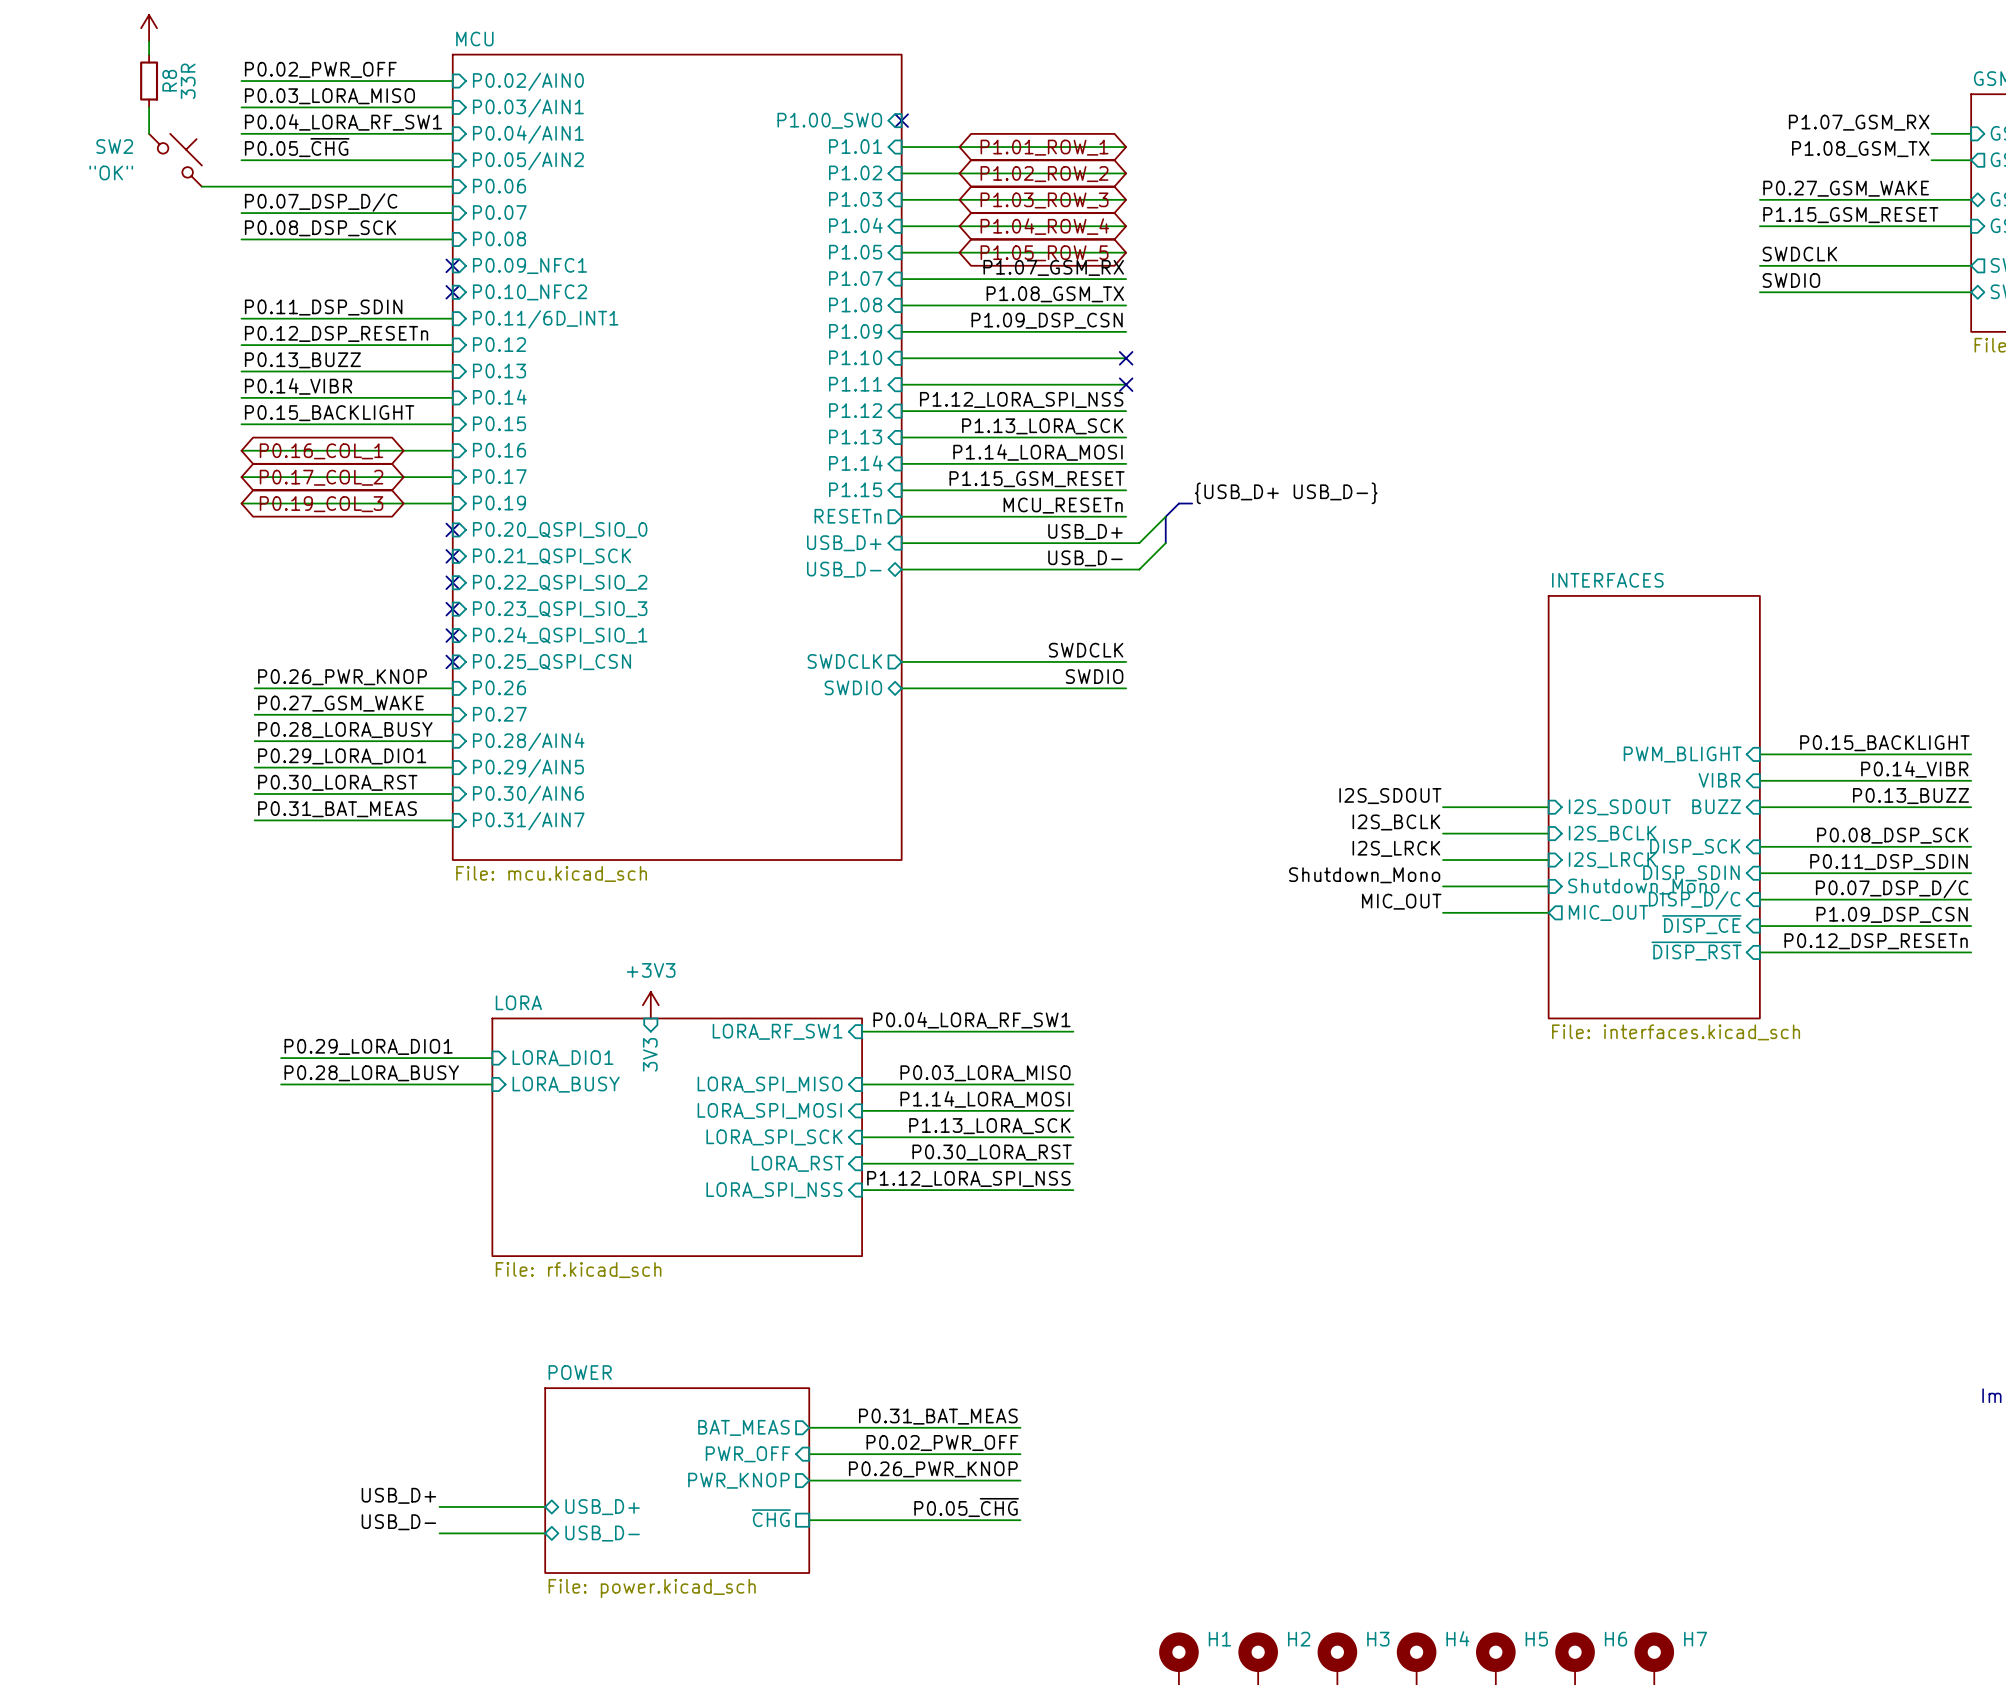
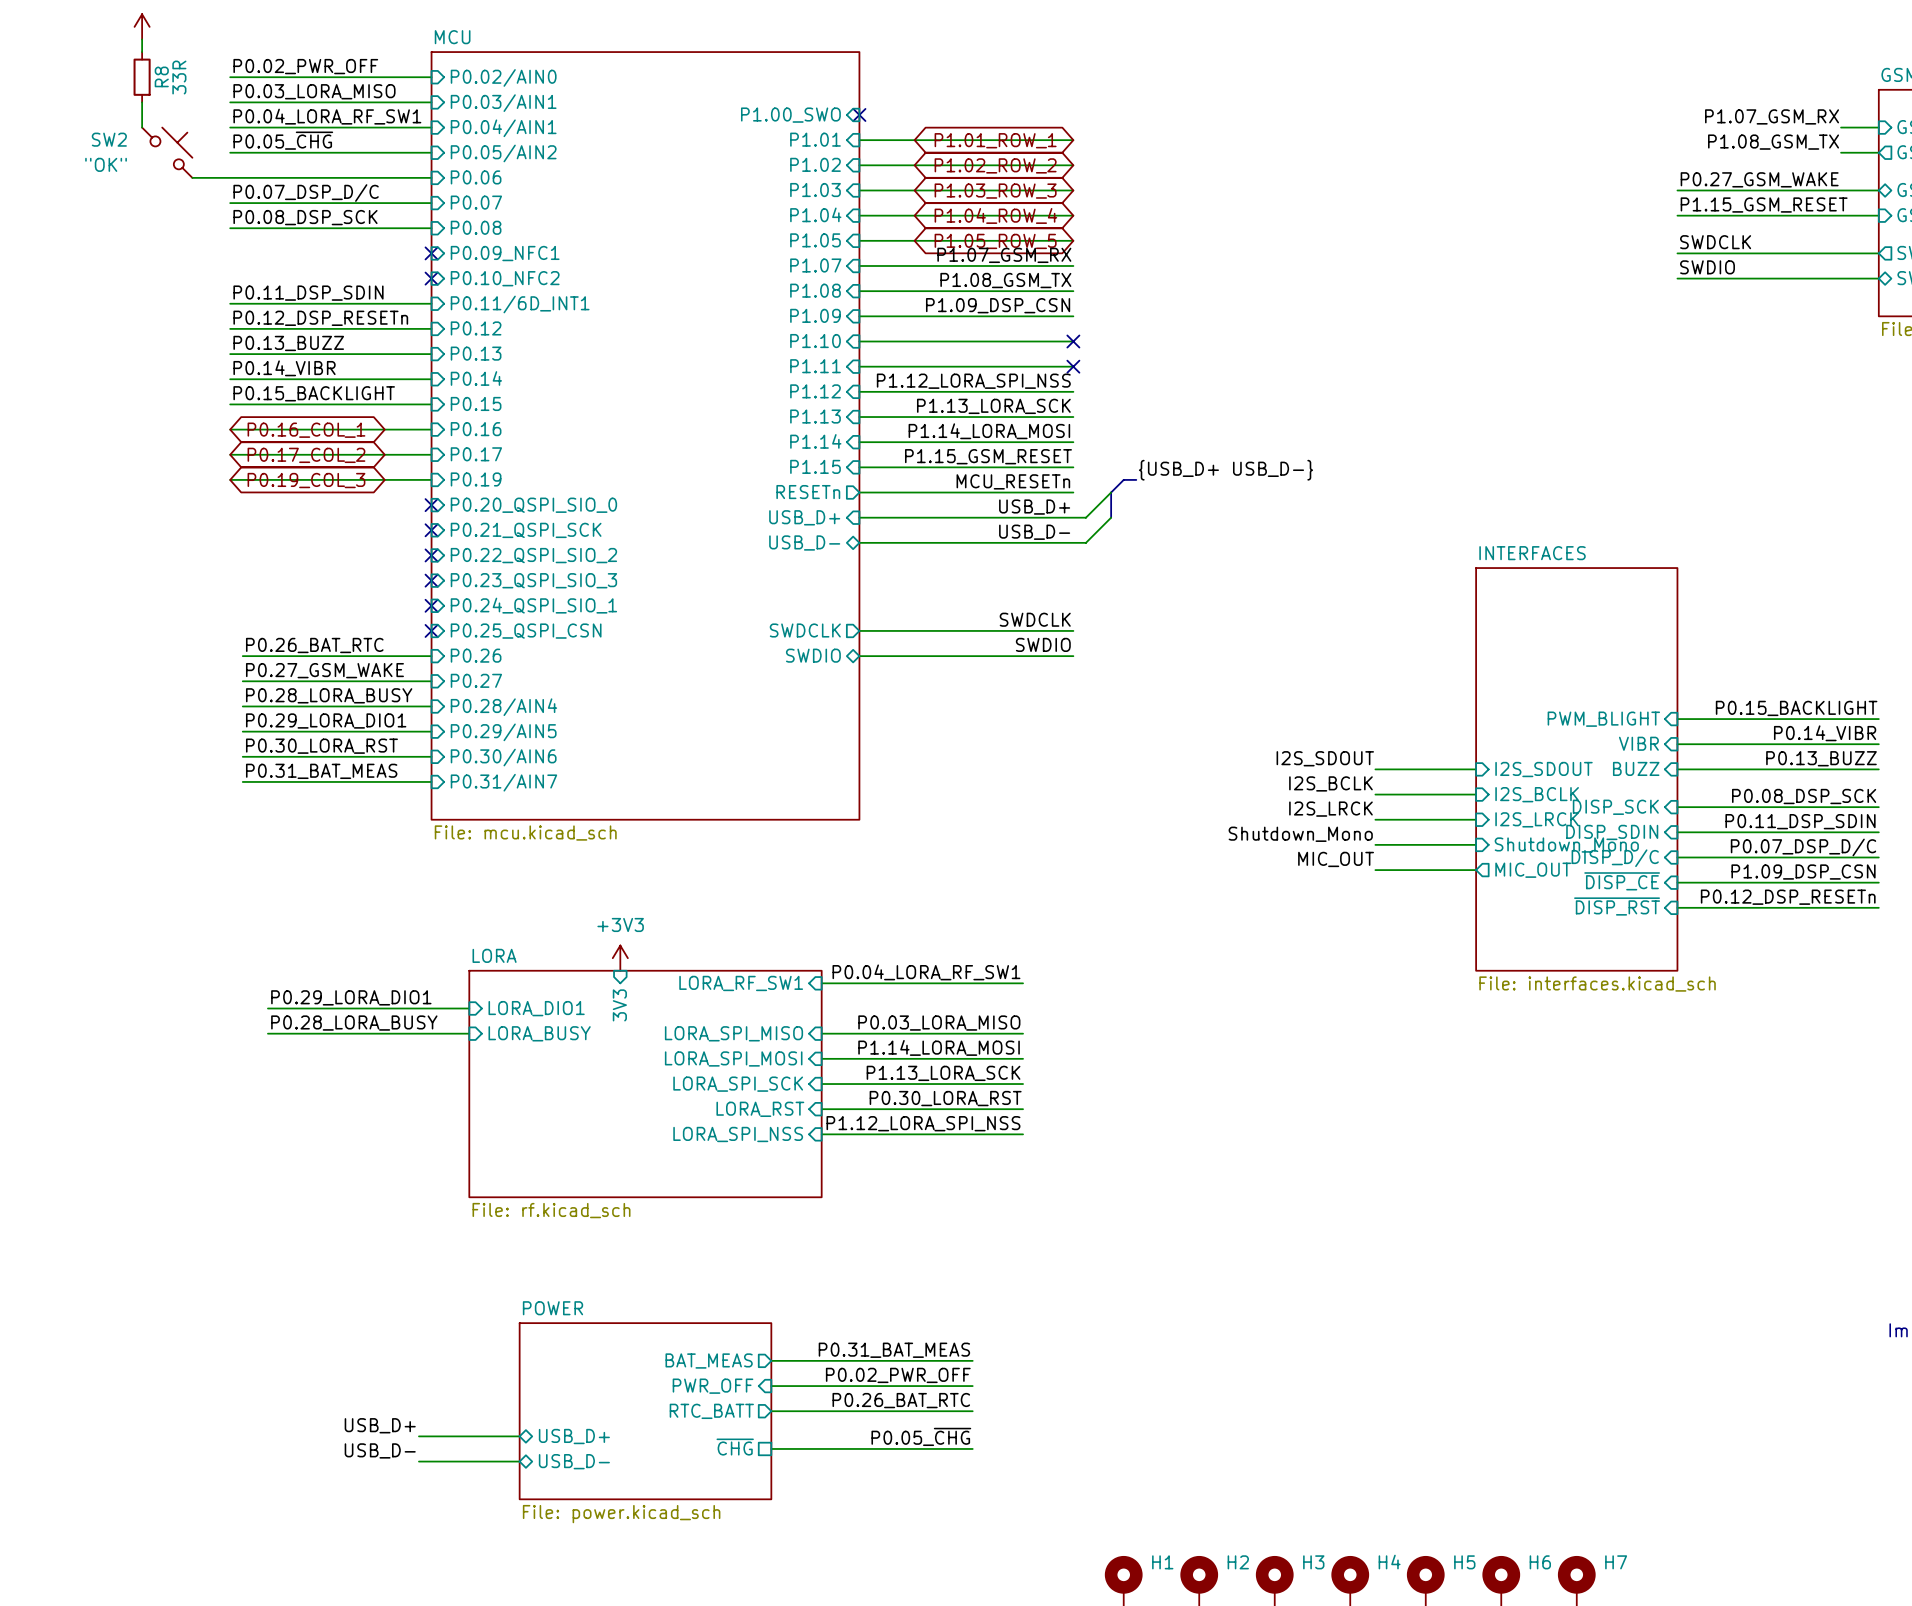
label: P0.26_PWR_KNOP (342, 677) -> P0.26_BAT_RTC (314, 645)
label: P0.26_PWR_KNOP (933, 1469) -> P0.26_BAT_RTC (901, 1400)
sheet pin: PWR_KNOP (738, 1480) -> RTC_BATT (711, 1411)

